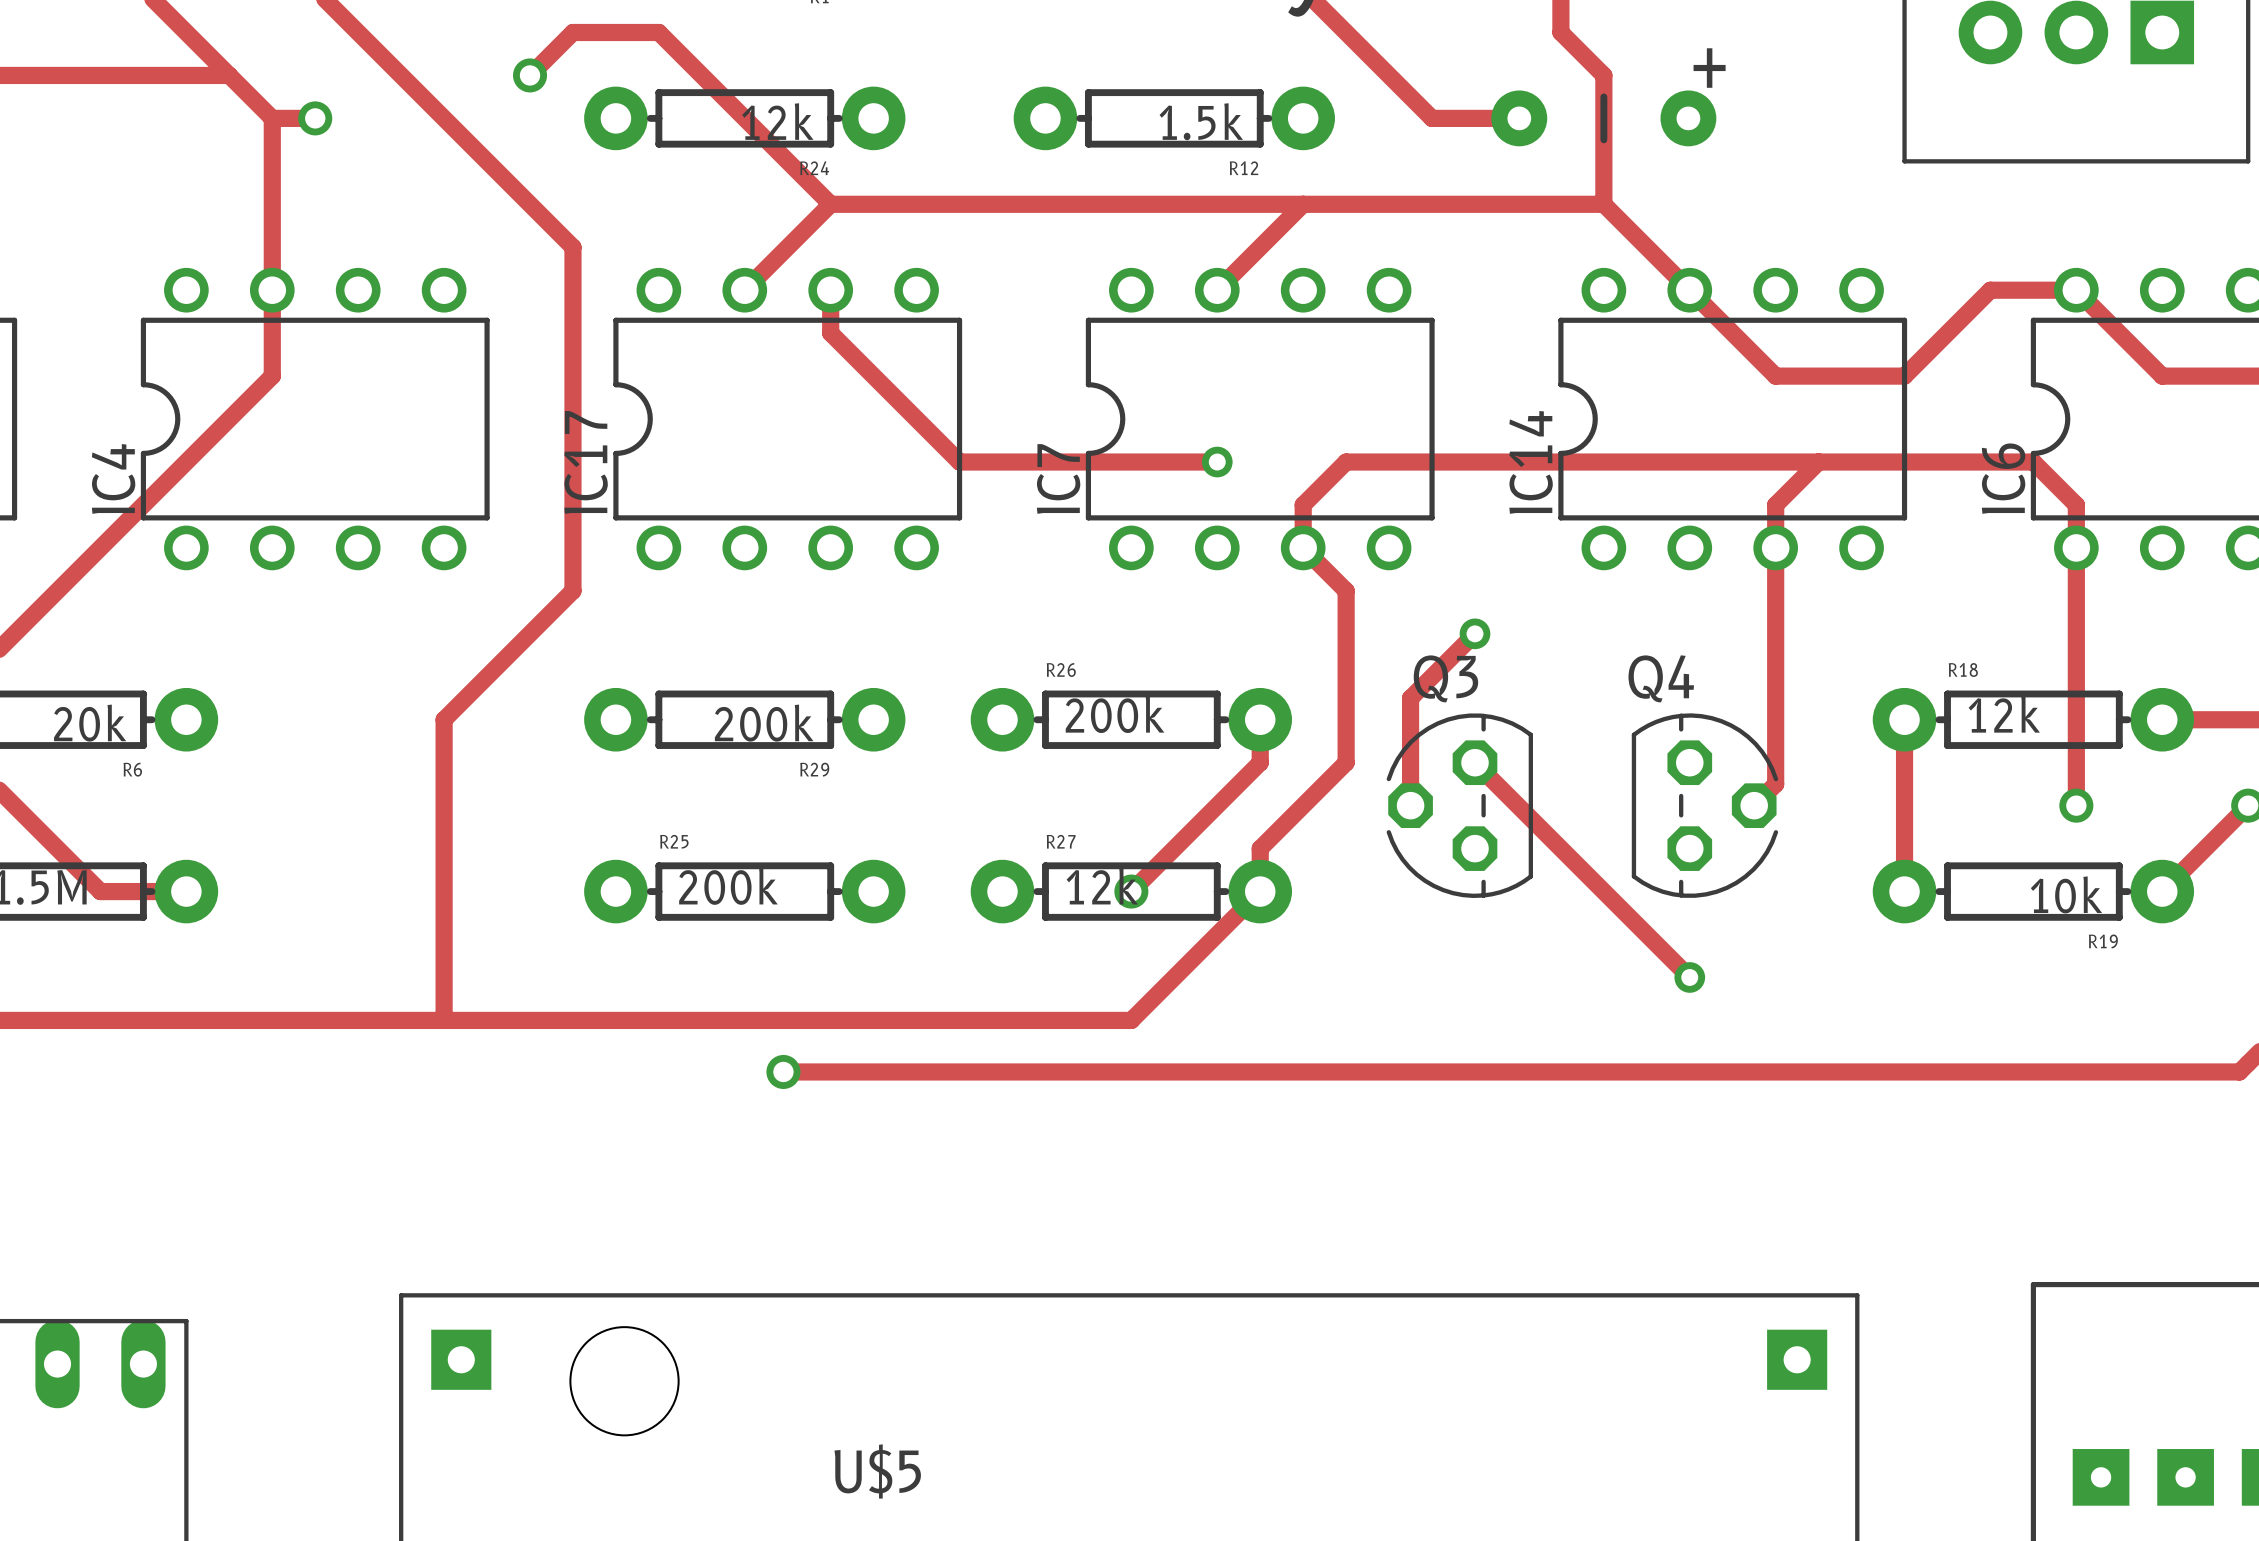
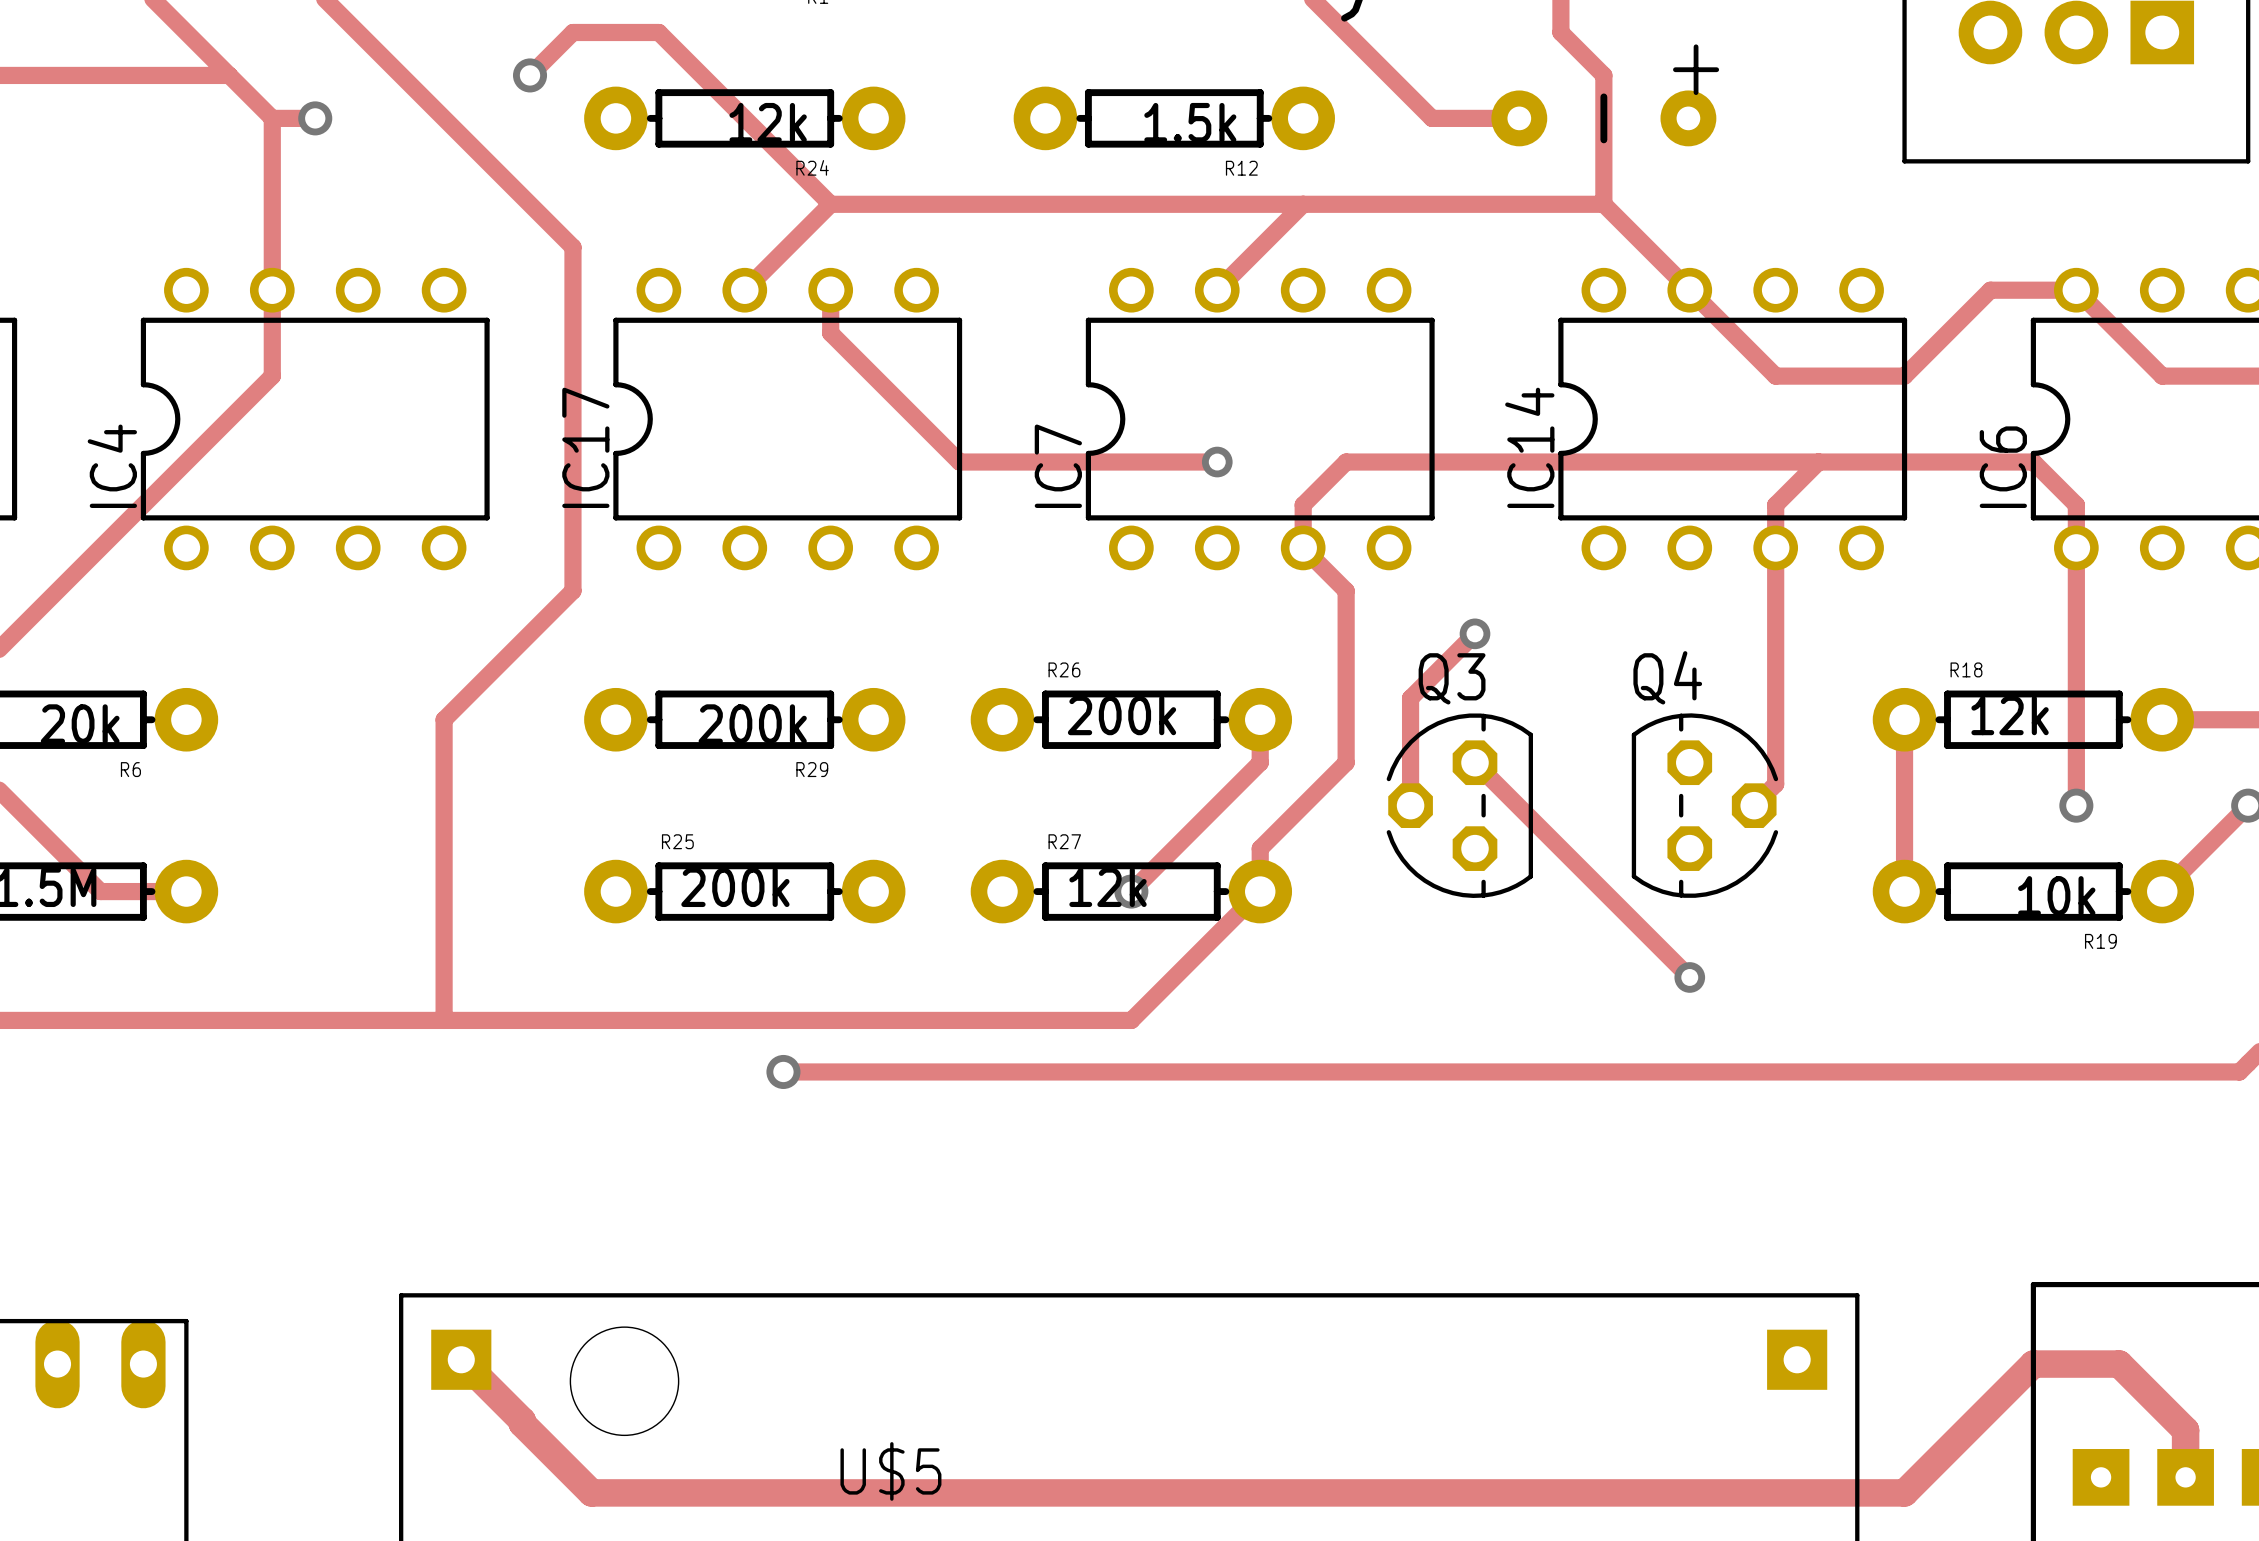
track: none -> (461, 1359) (591, 1492) (1904, 1492) (2033, 1364) (2119, 1364) (2185, 1430) (2185, 1477)

